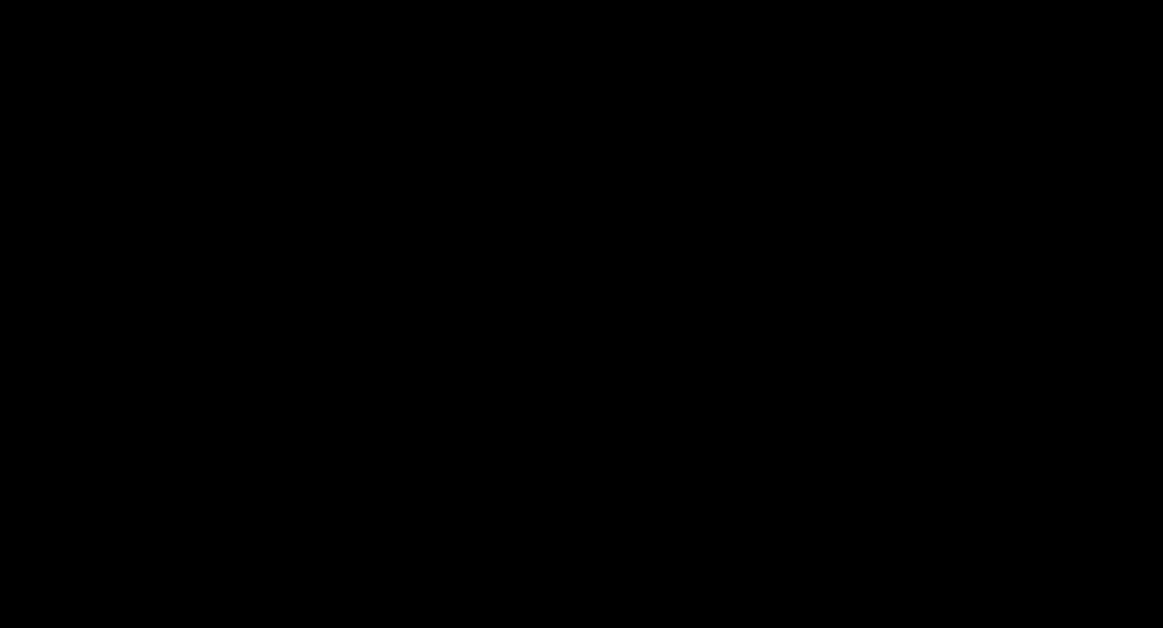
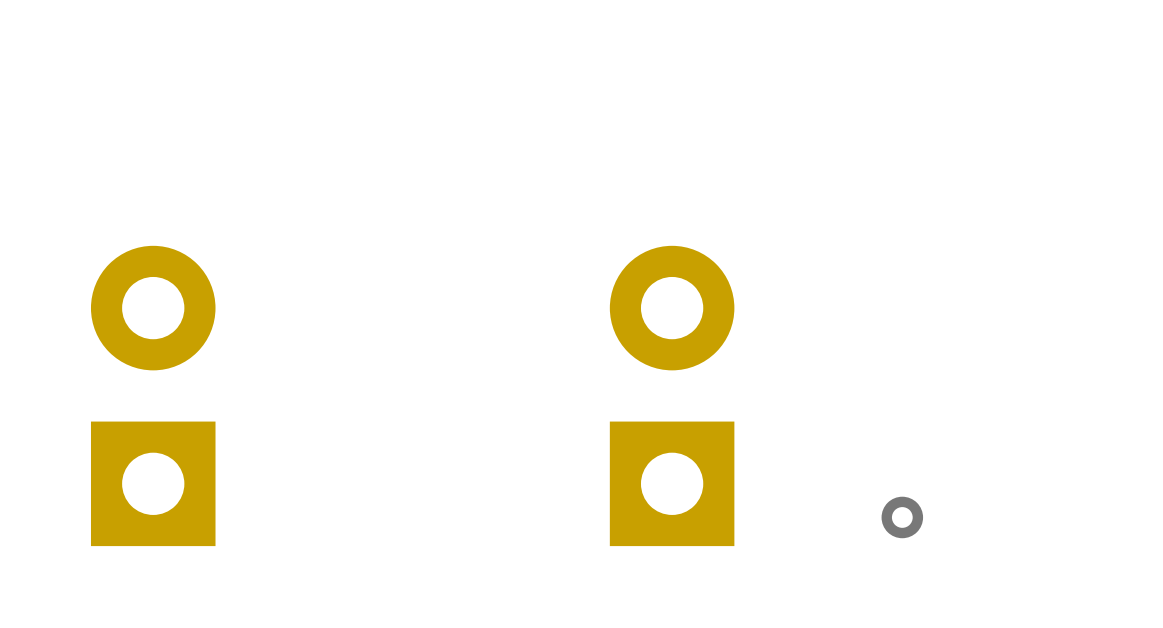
part: none -> (153, 395)
part: none -> (672, 395)
via: none -> (902, 517)

